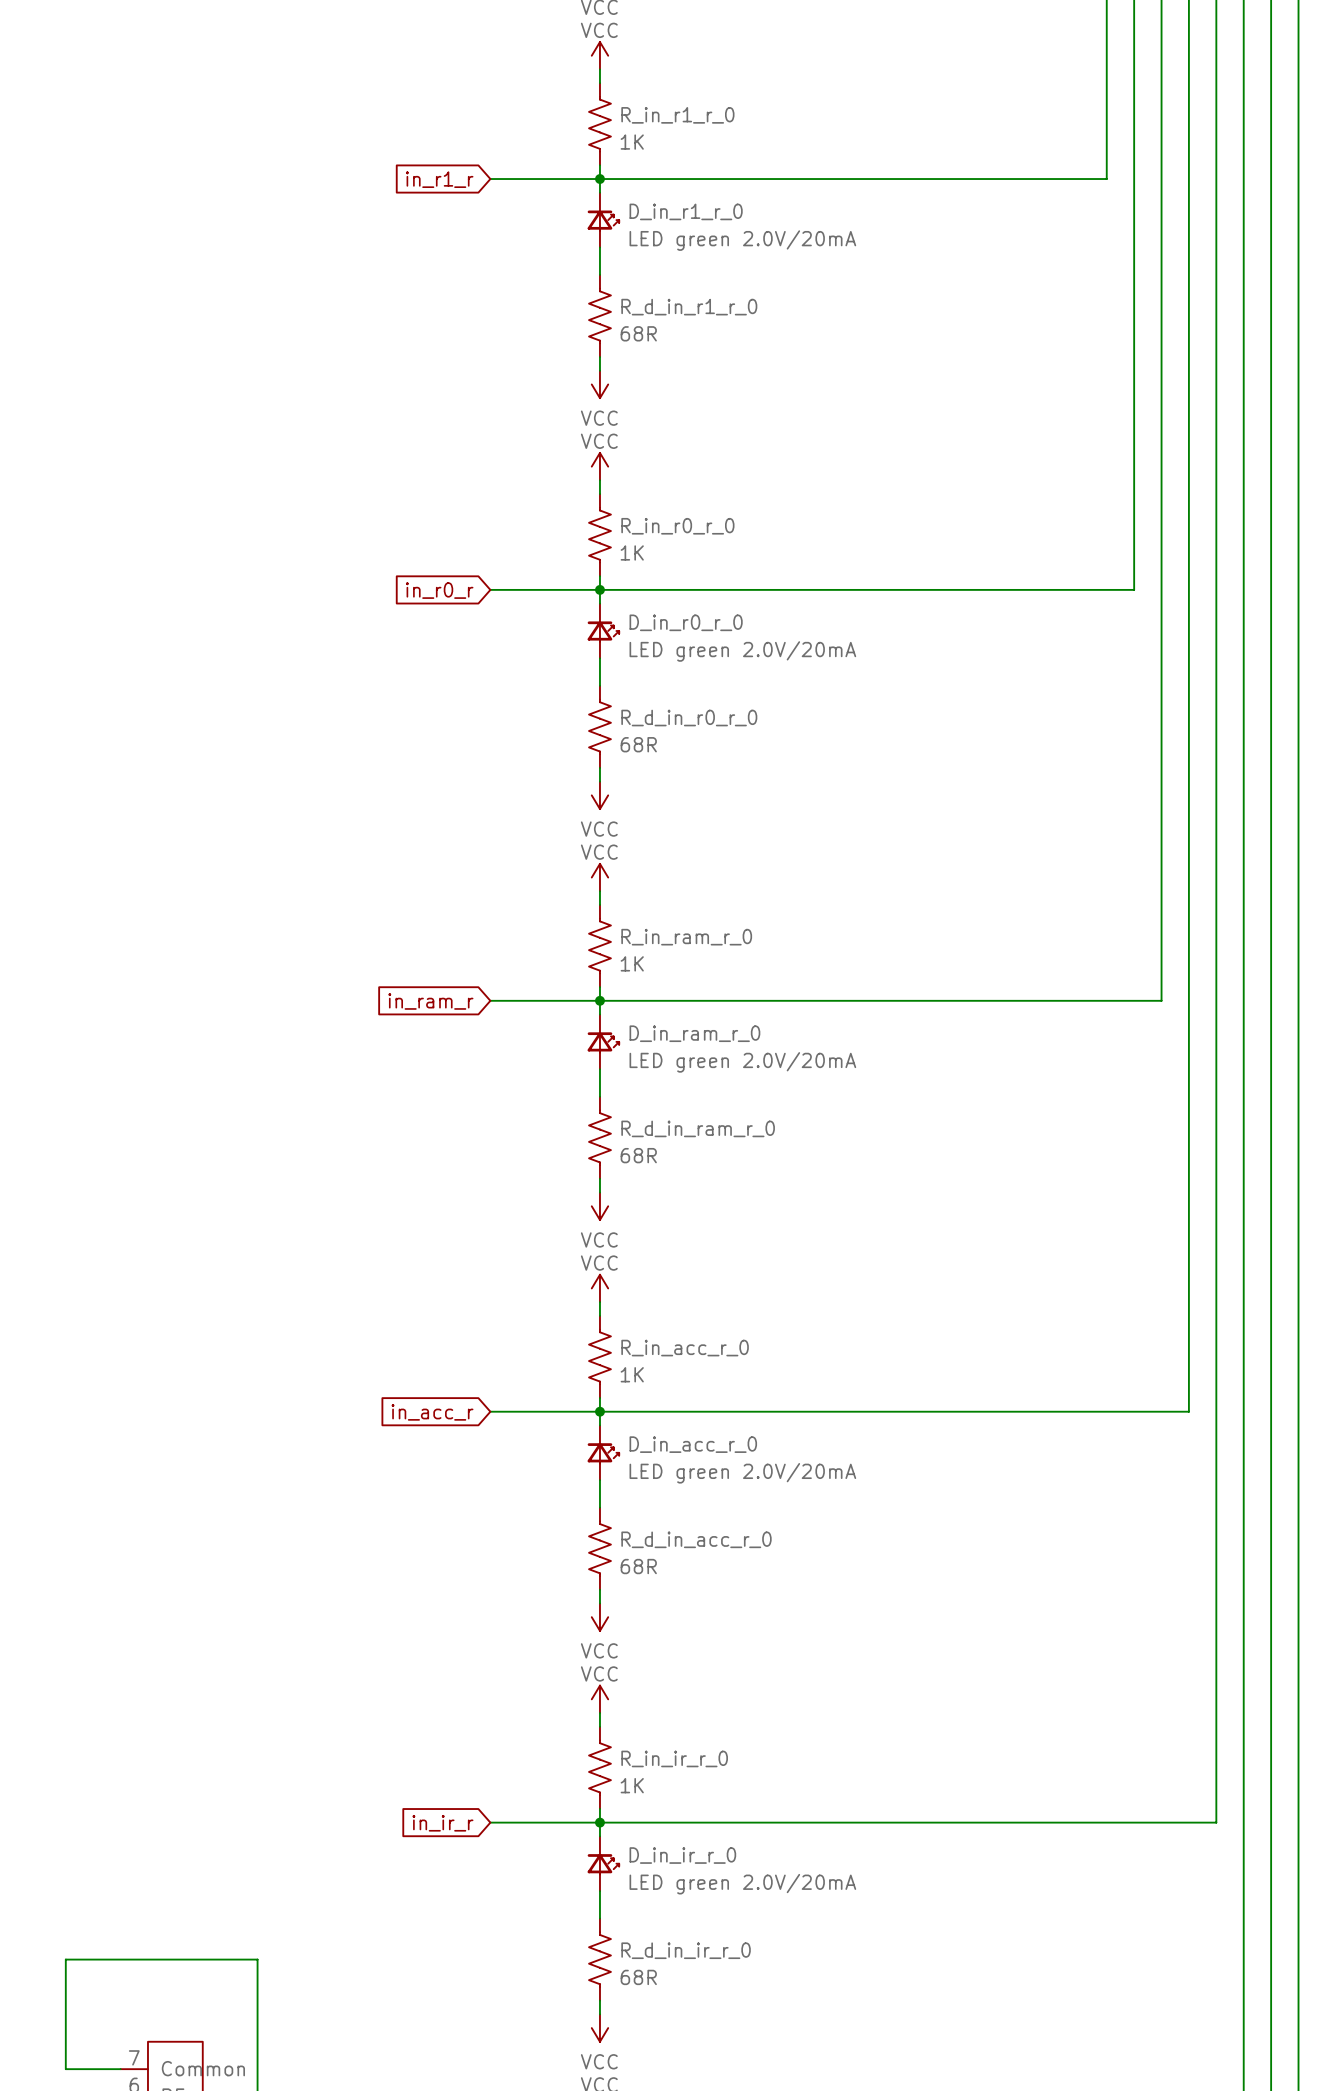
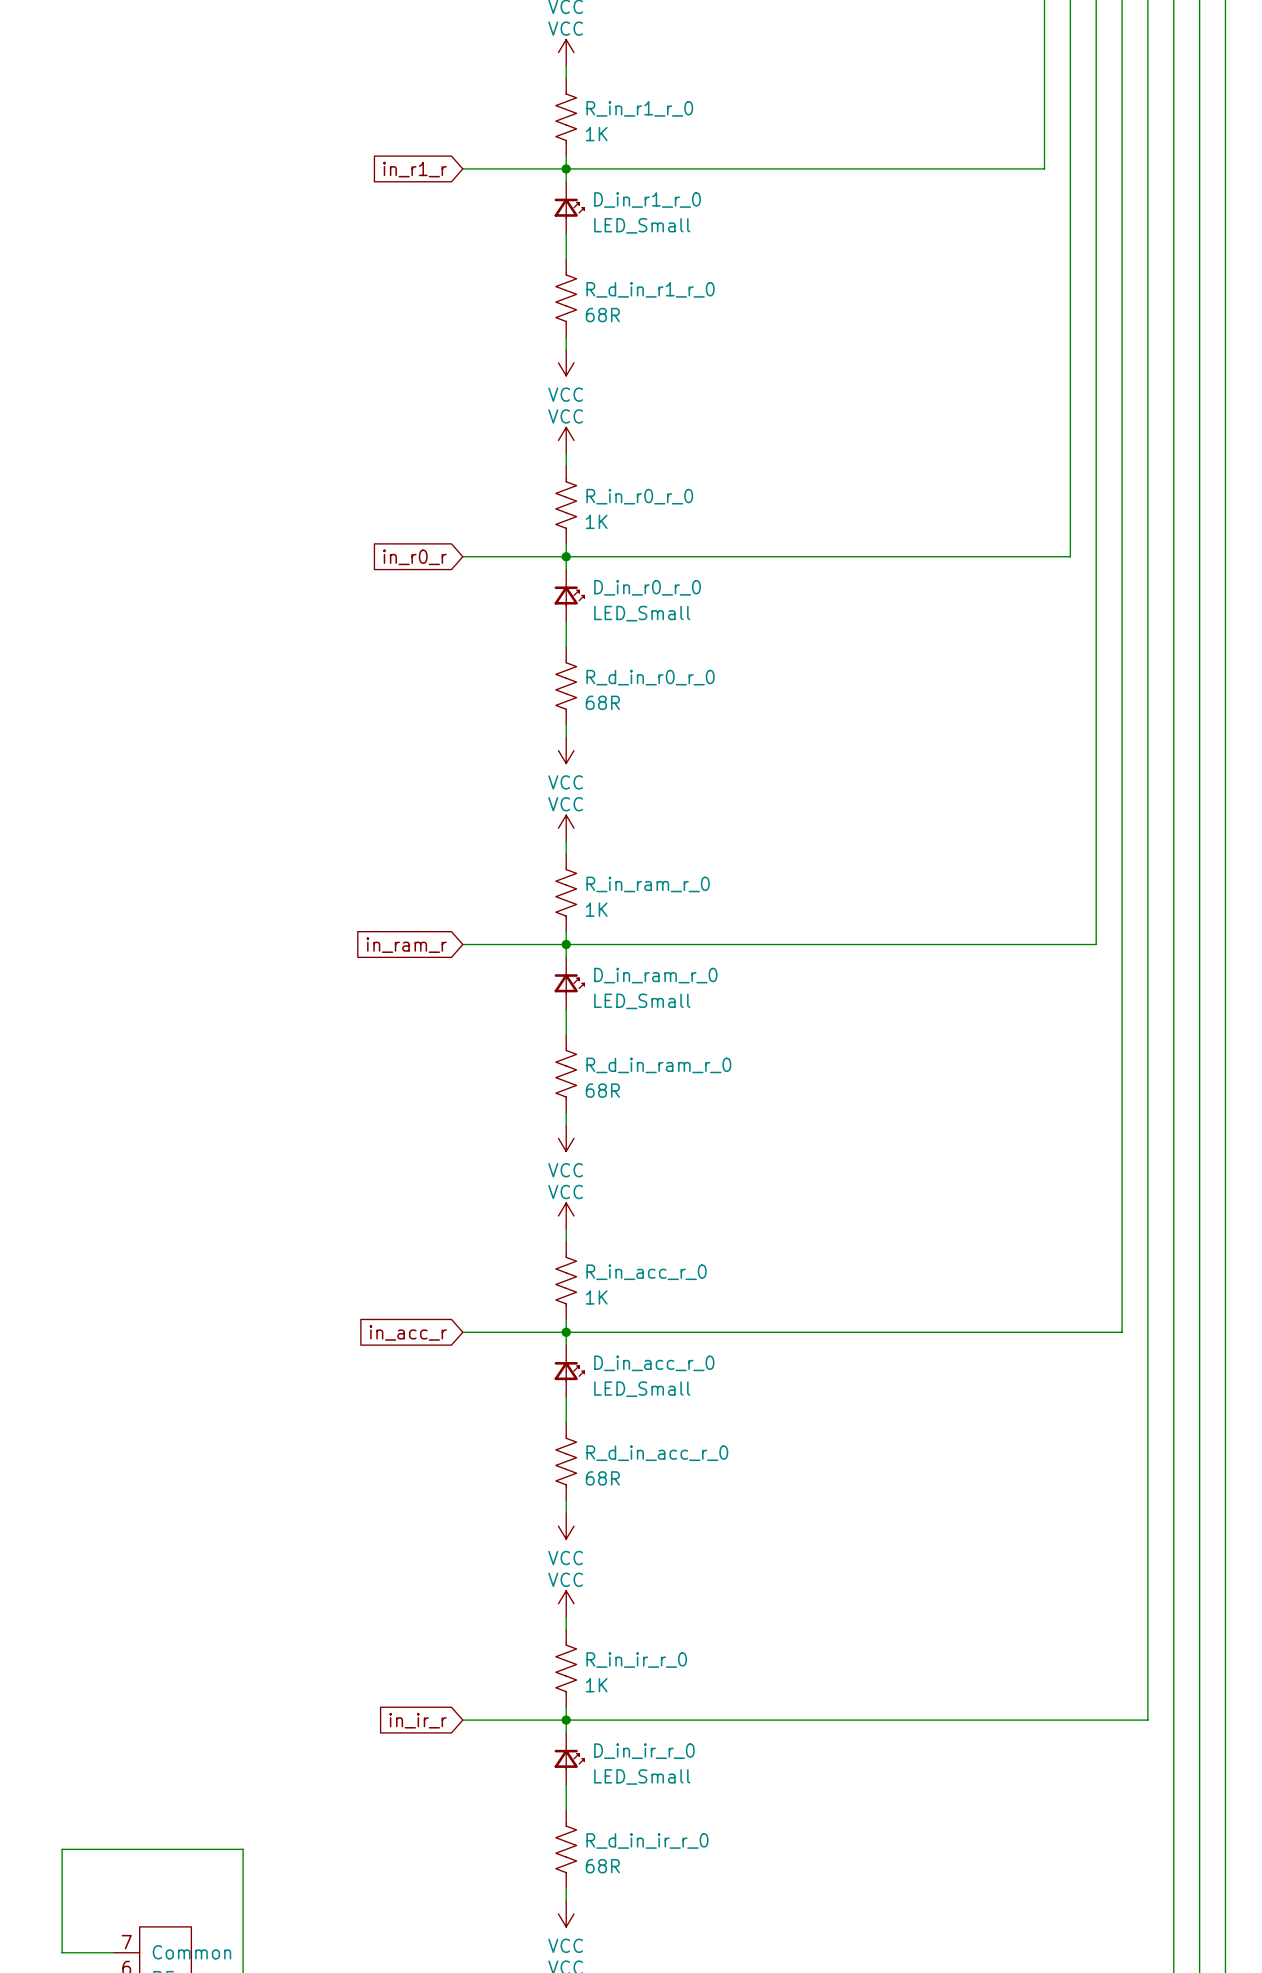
D_in_r1_r_0 value: LED green 2.0V/20mA (742, 240) -> LED_Small (642, 225)
D_in_r0_r_0 value: LED green 2.0V/20mA (742, 651) -> LED_Small (642, 613)
D_in_ram_r_0 value: LED green 2.0V/20mA (742, 1062) -> LED_Small (642, 1001)
D_in_acc_r_0 value: LED green 2.0V/20mA (742, 1473) -> LED_Small (642, 1389)
D_in_ir_r_0 value: LED green 2.0V/20mA (742, 1884) -> LED_Small (642, 1776)

